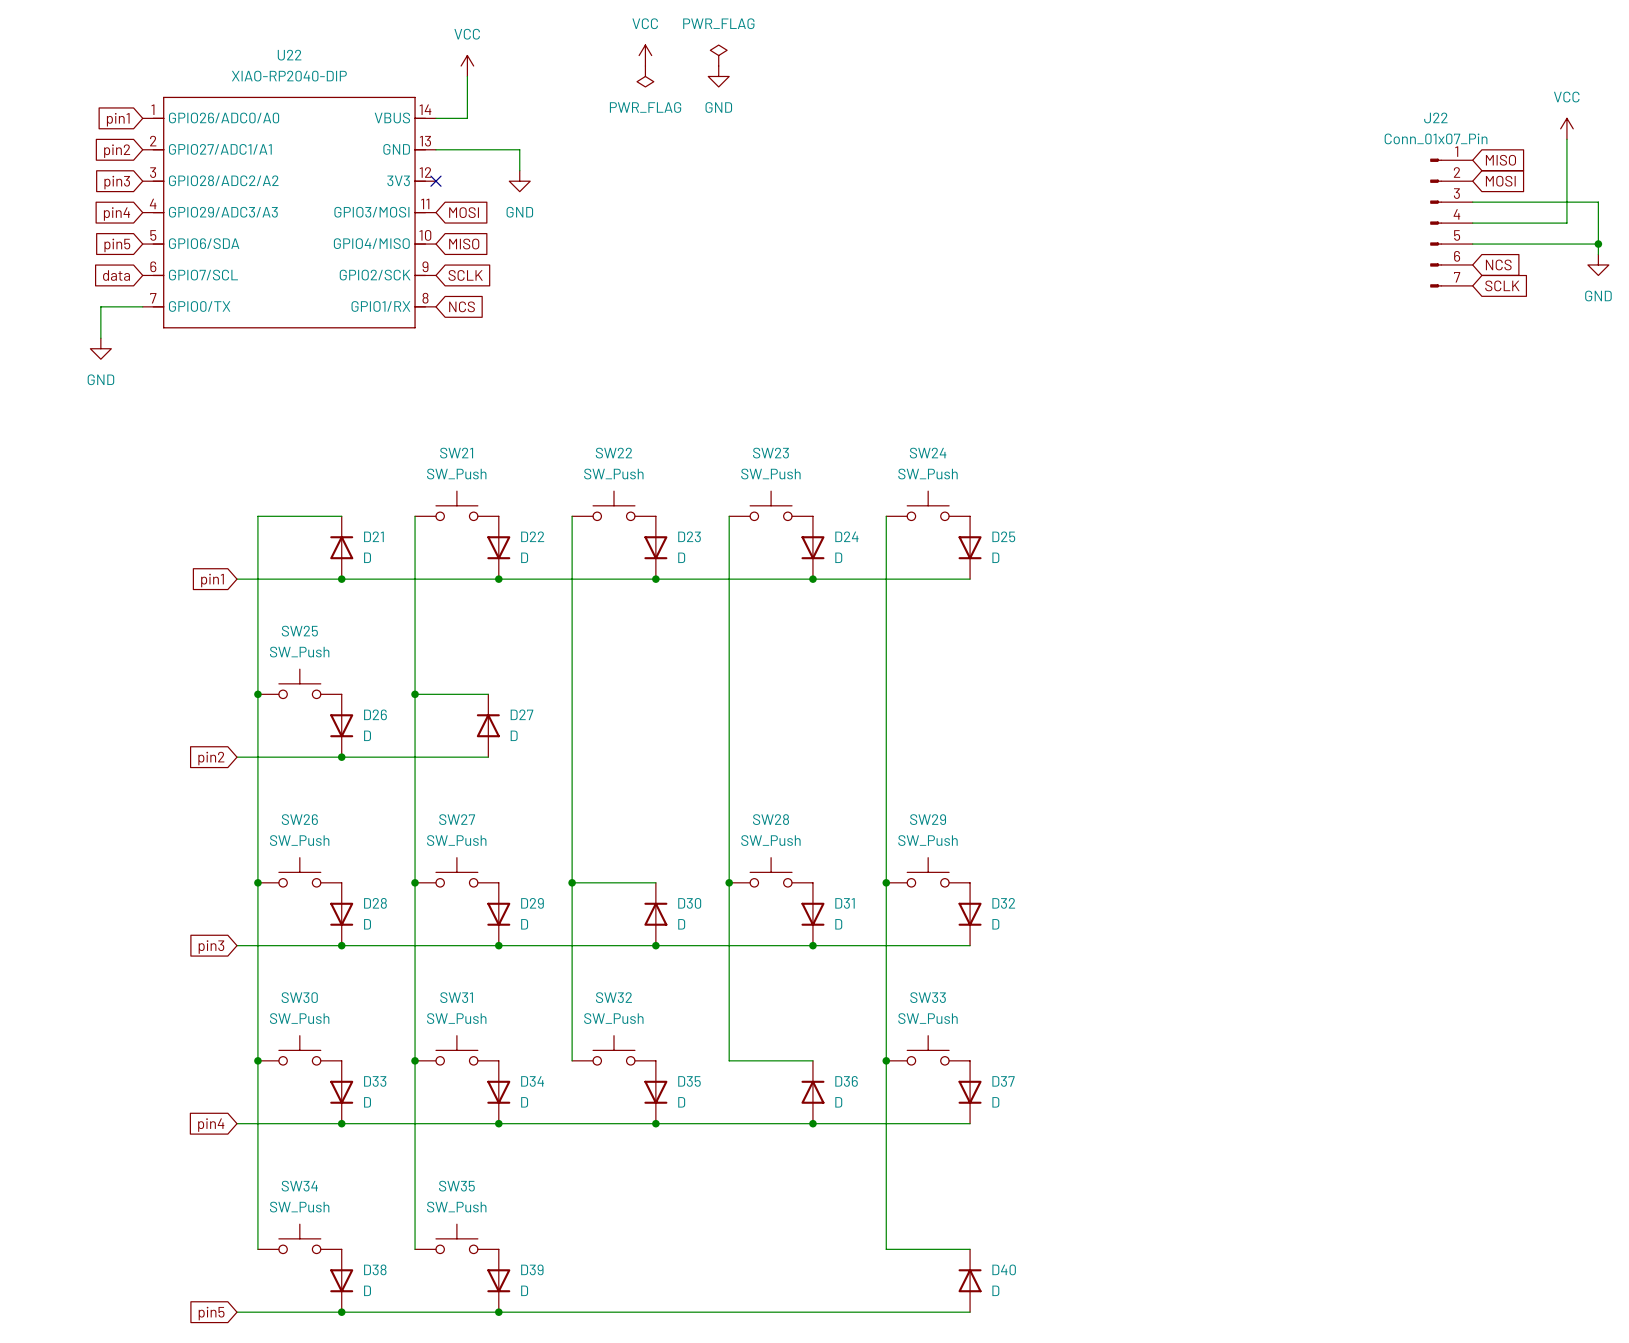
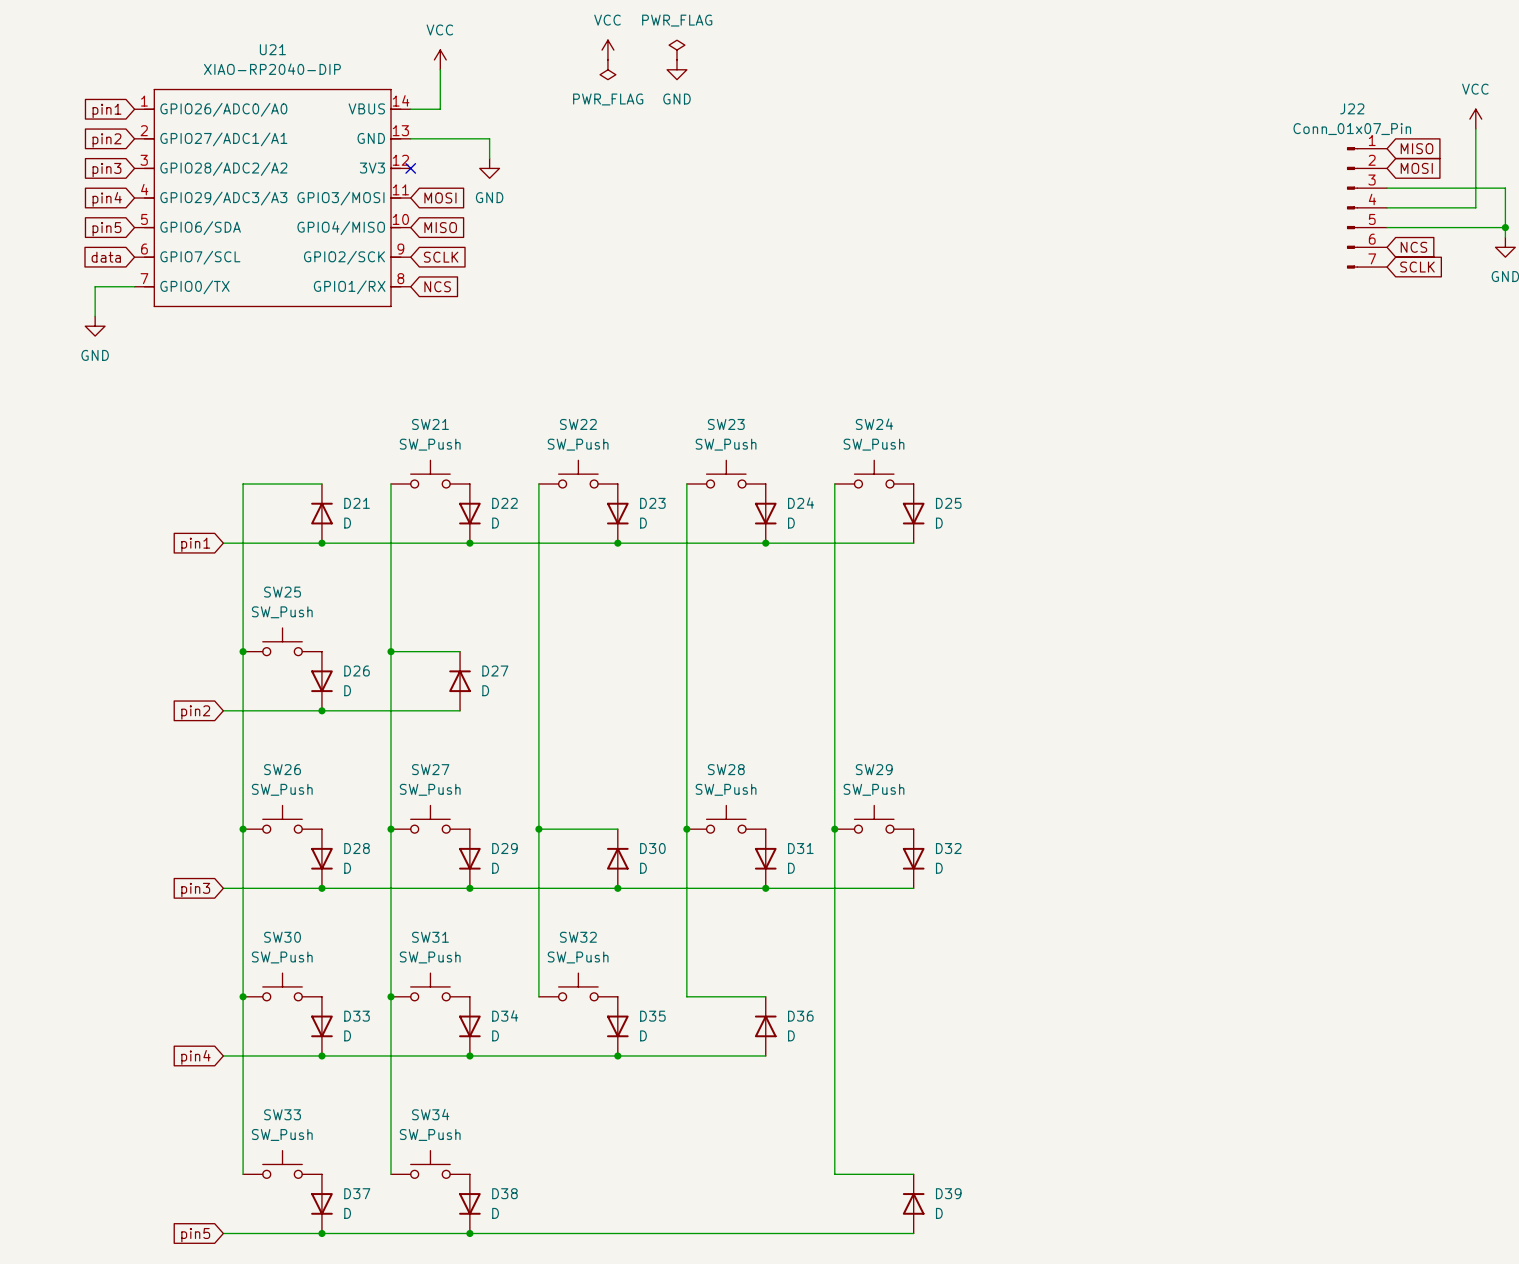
U22 name: U22 (289, 55) -> U21 (272, 49)
SW33: SW_Push (928, 1050) -> none
junction: (886, 1060) -> none
D37: D (970, 1092) -> none
wire: (812, 1123) (970, 1123) -> none
junction: (812, 1123) -> none
SW34 name: SW34 (299, 1186) -> SW33 (282, 1114)
SW35 name: SW35 (456, 1186) -> SW34 (430, 1114)
D38 name: D38 (375, 1269) -> D37 (357, 1193)
D39 name: D39 (532, 1269) -> D38 (504, 1193)
D40 name: D40 (1004, 1269) -> D39 (948, 1193)

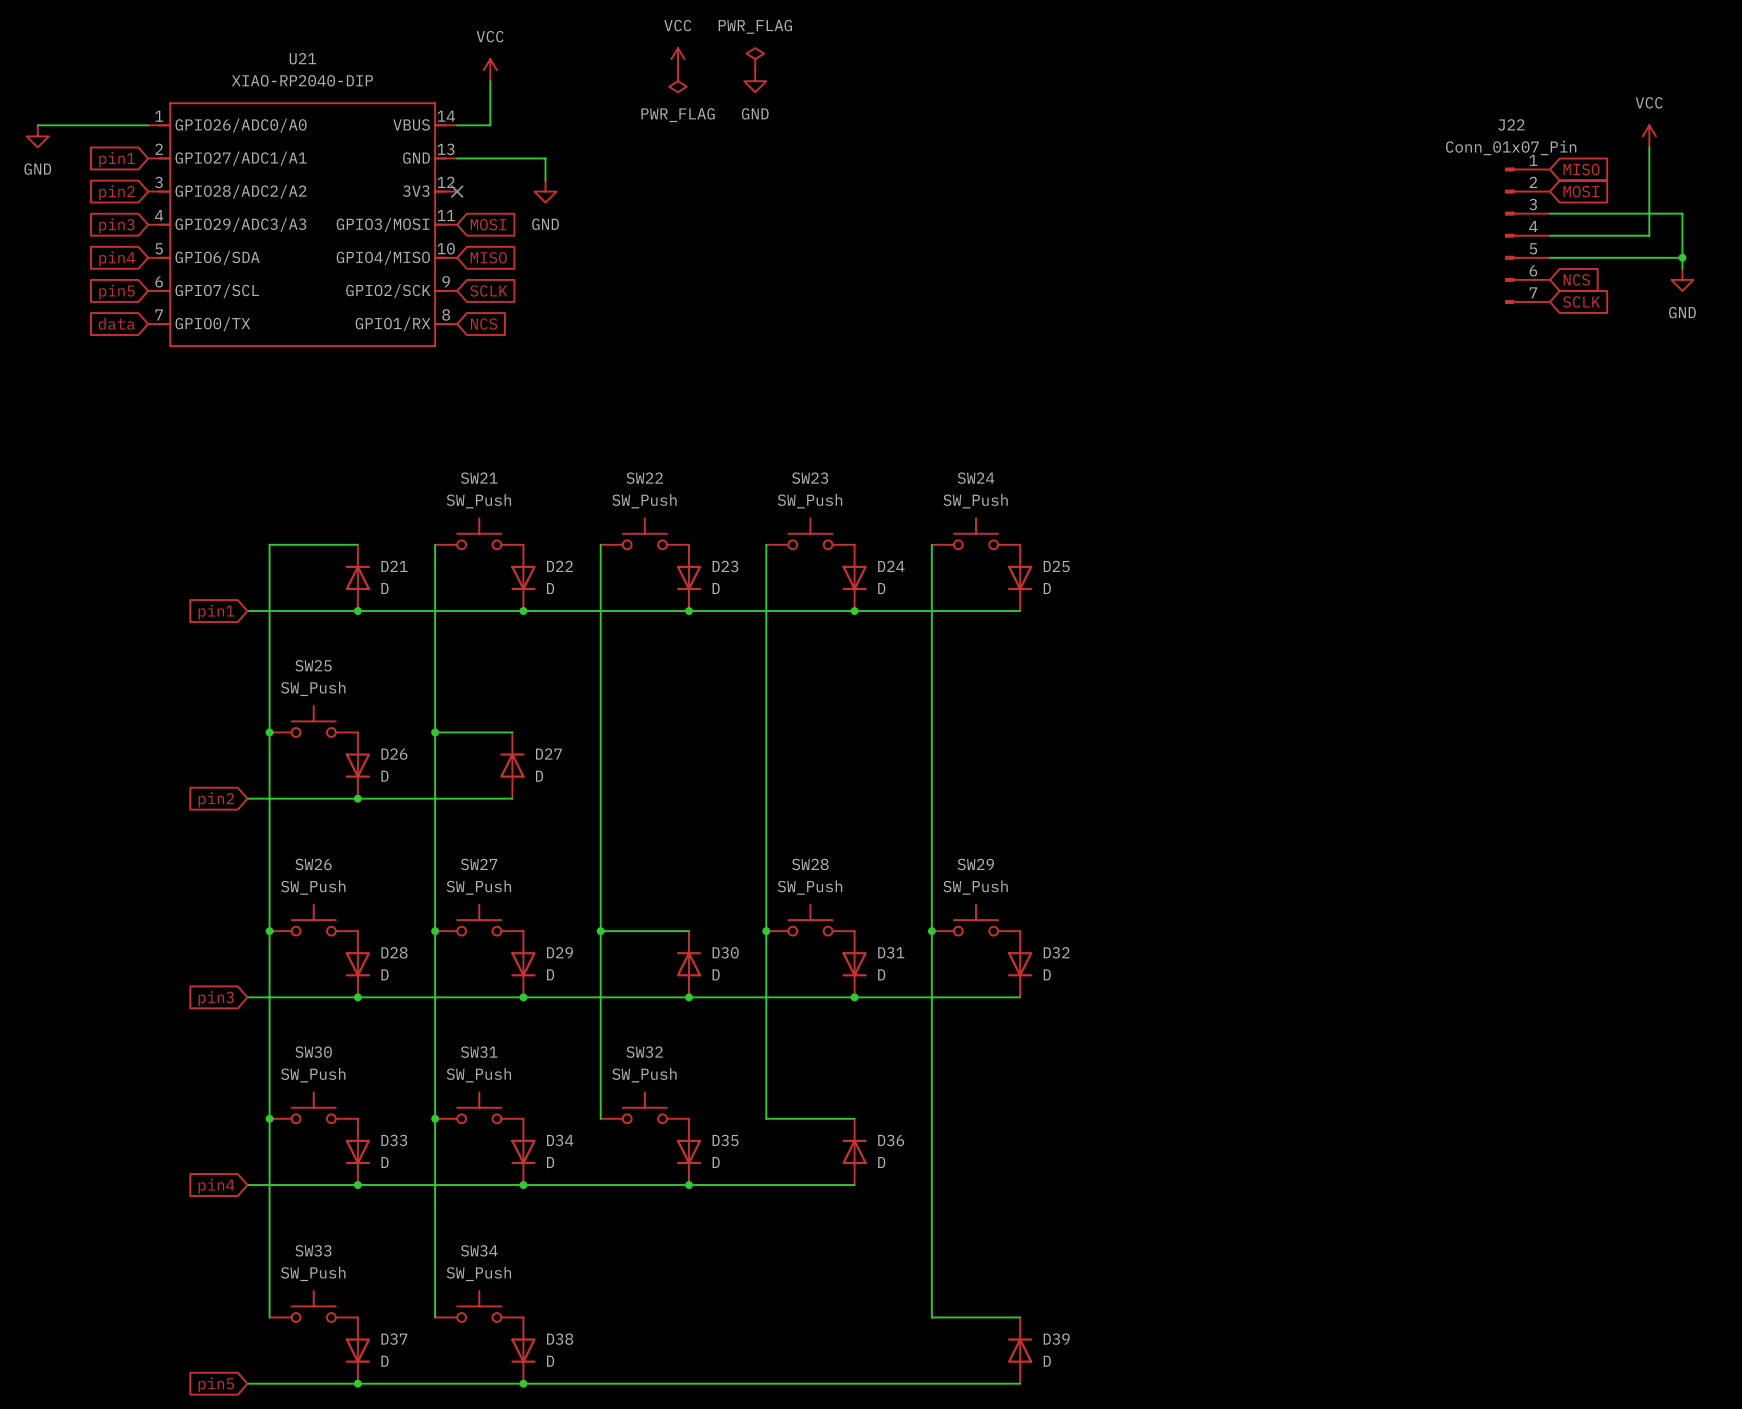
wire: none -> (37, 125) (148, 125)
global label: pin1 (106, 110) -> none
power symbol: none -> GND (37, 136)
global label: pin2 (106, 140) -> pin1 (117, 159)
global label: pin3 (106, 170) -> pin2 (117, 192)
global label: pin4 (107, 199) -> pin3 (116, 225)
global label: pin5 (106, 229) -> pin4 (117, 258)
global label: data (106, 257) -> pin5 (116, 292)
global label: none -> data (116, 323)
wire: (134, 286) (95, 286) (95, 316) -> none
power symbol: GND (95, 326) -> none

